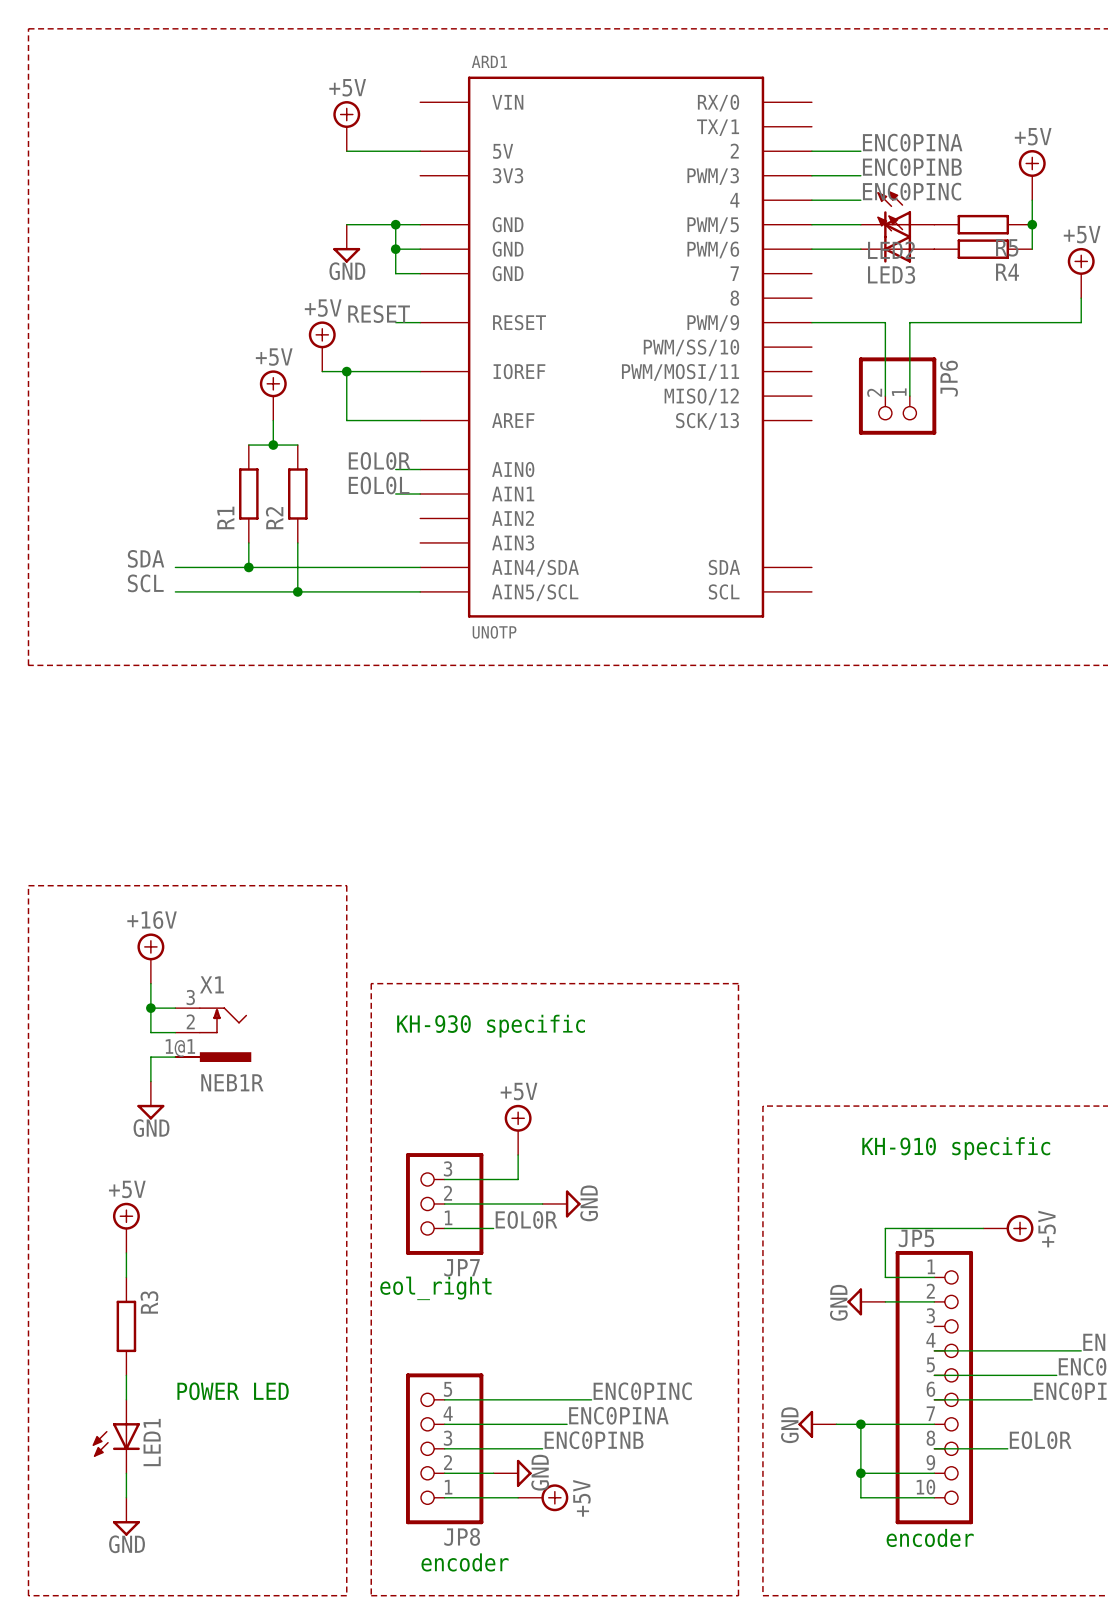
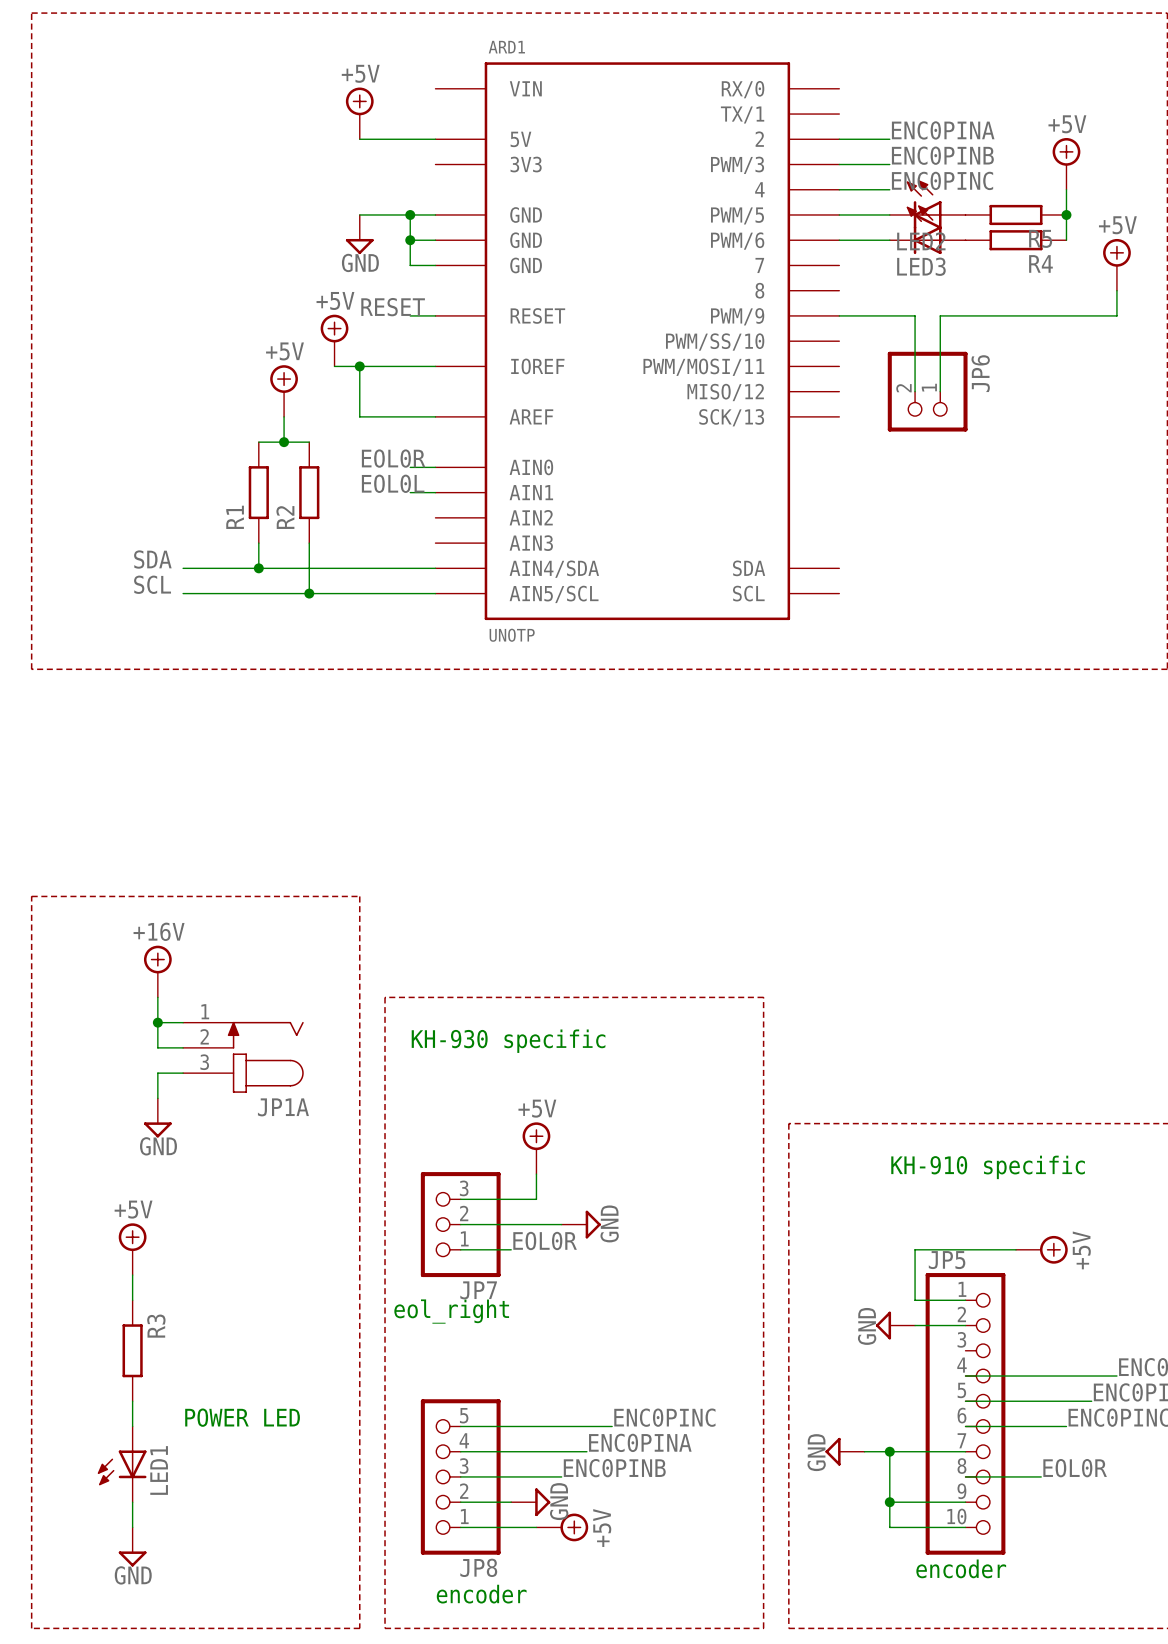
X1: NEB1R (213, 1034) -> none
JP1A: none -> (243, 1057)

